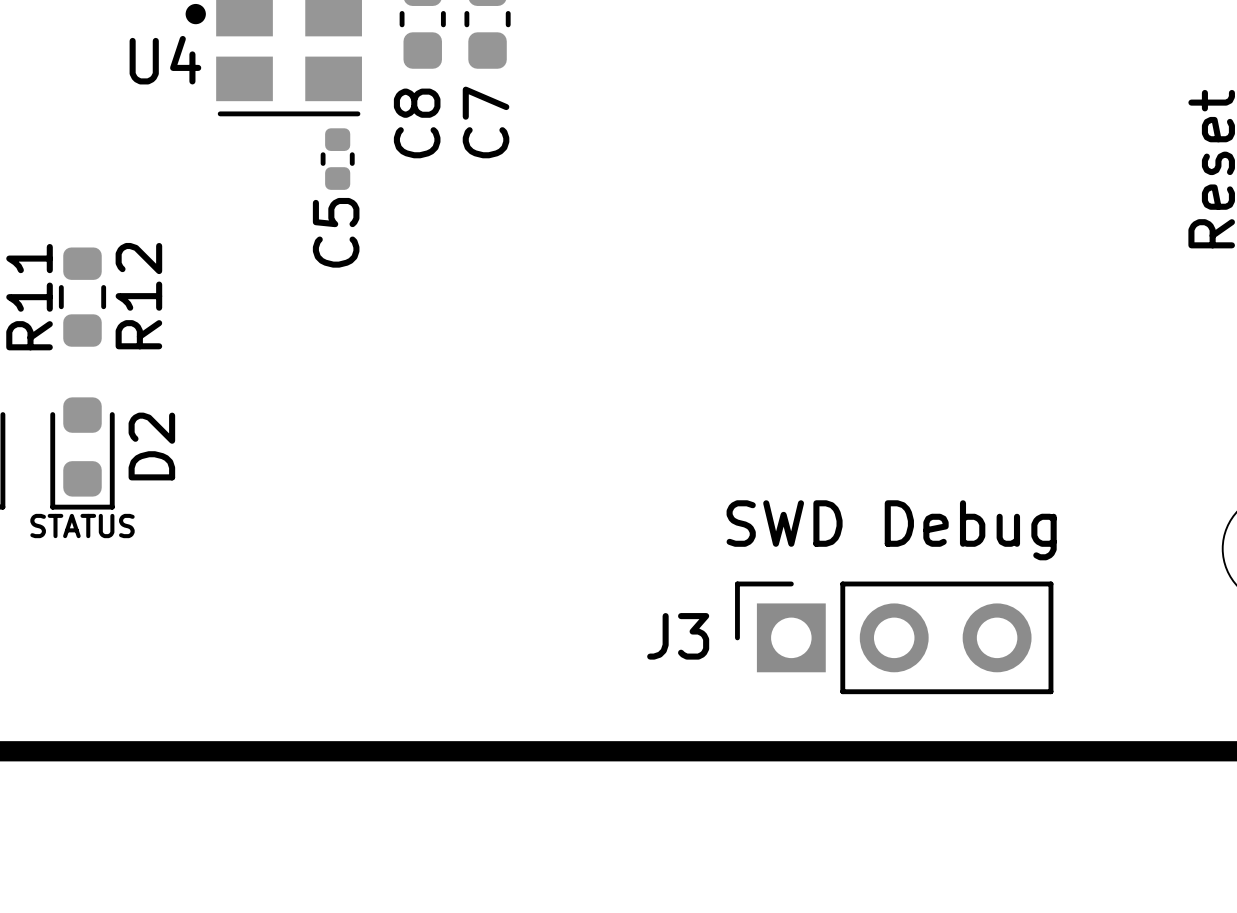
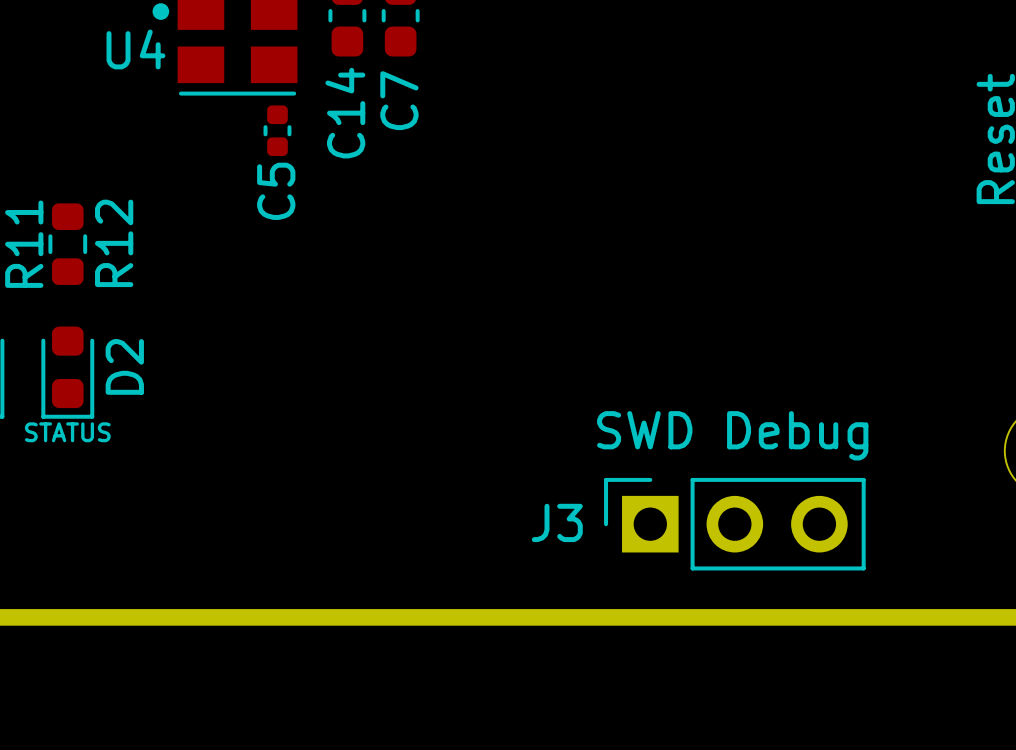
C8 name: C8 (417, 123) -> C14 (345, 113)

